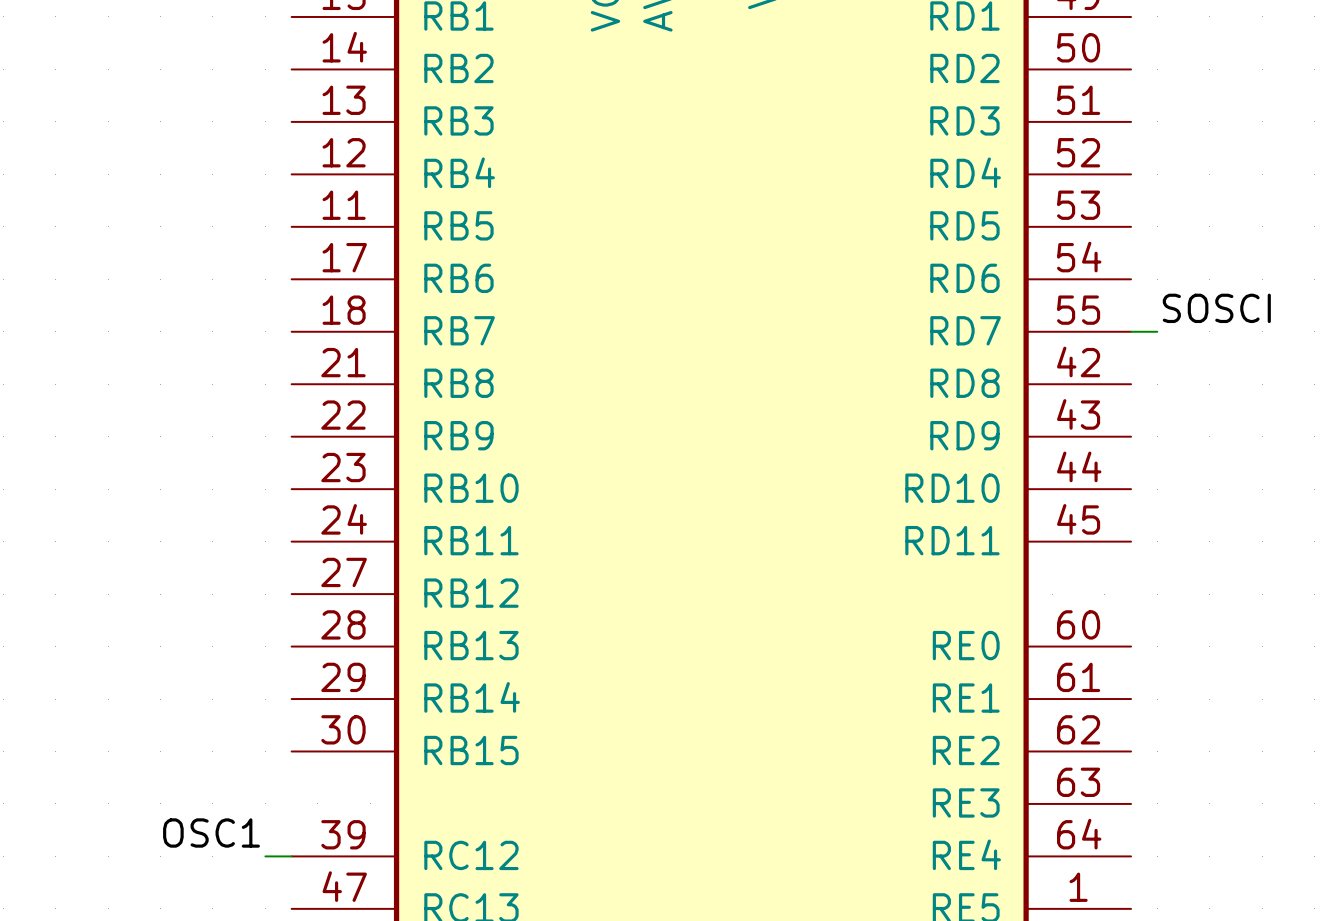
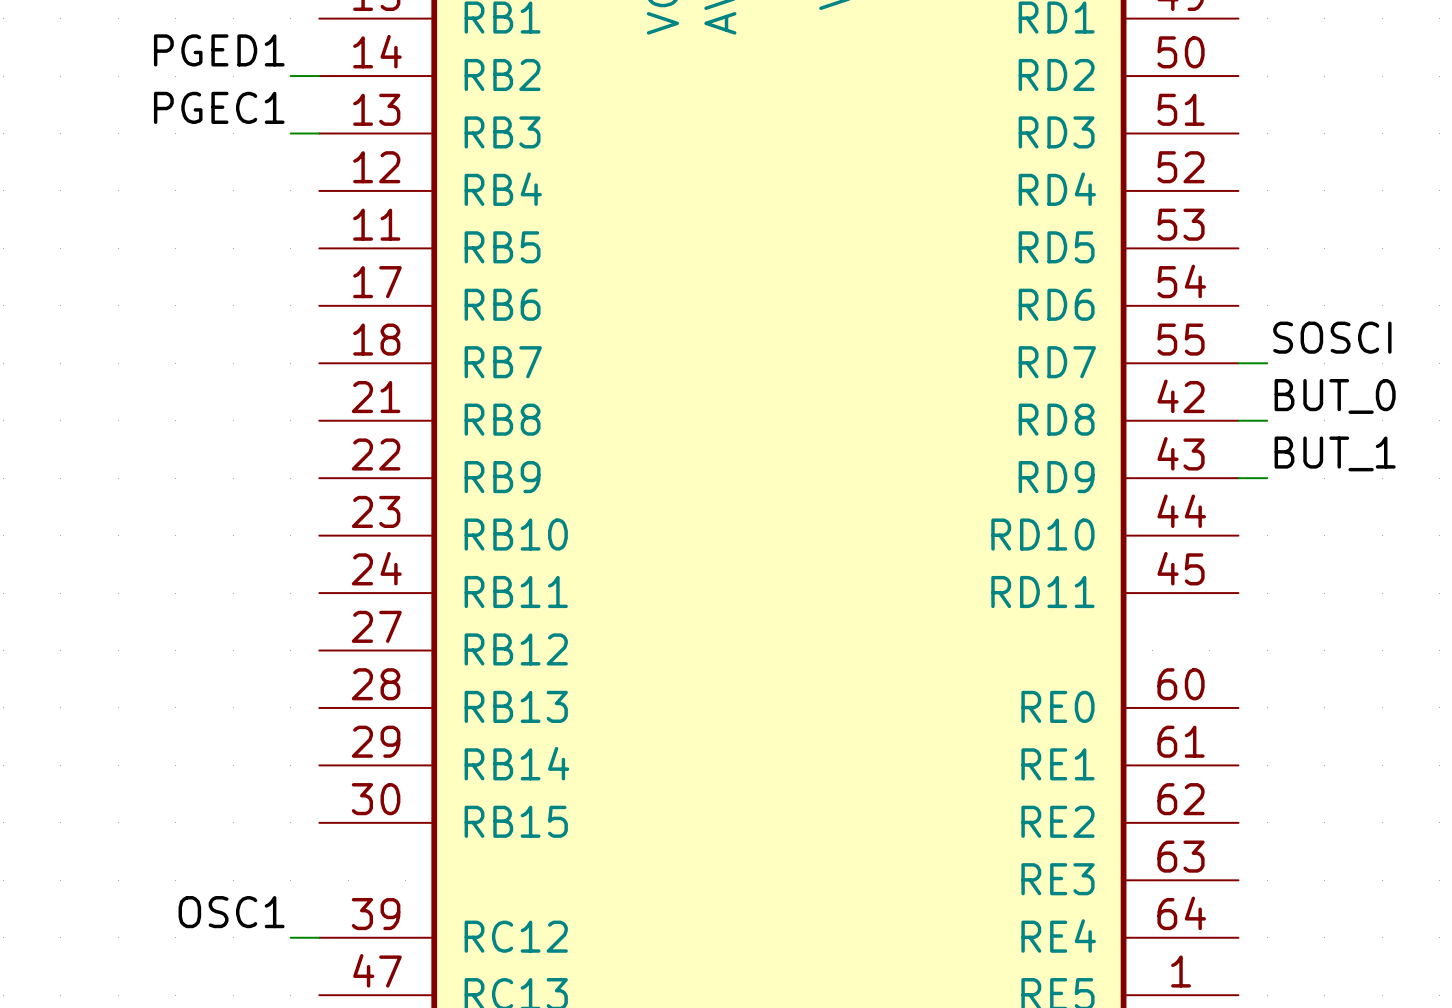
label: none -> PGED1 (219, 50)
wire: none -> (290, 76) (319, 76)
label: none -> PGEC1 (219, 107)
wire: none -> (290, 133) (319, 133)
label: none -> BUT_0 (1335, 396)
wire: none -> (1238, 420) (1267, 420)
label: none -> BUT_1 (1335, 453)
wire: none -> (1238, 478) (1267, 478)

